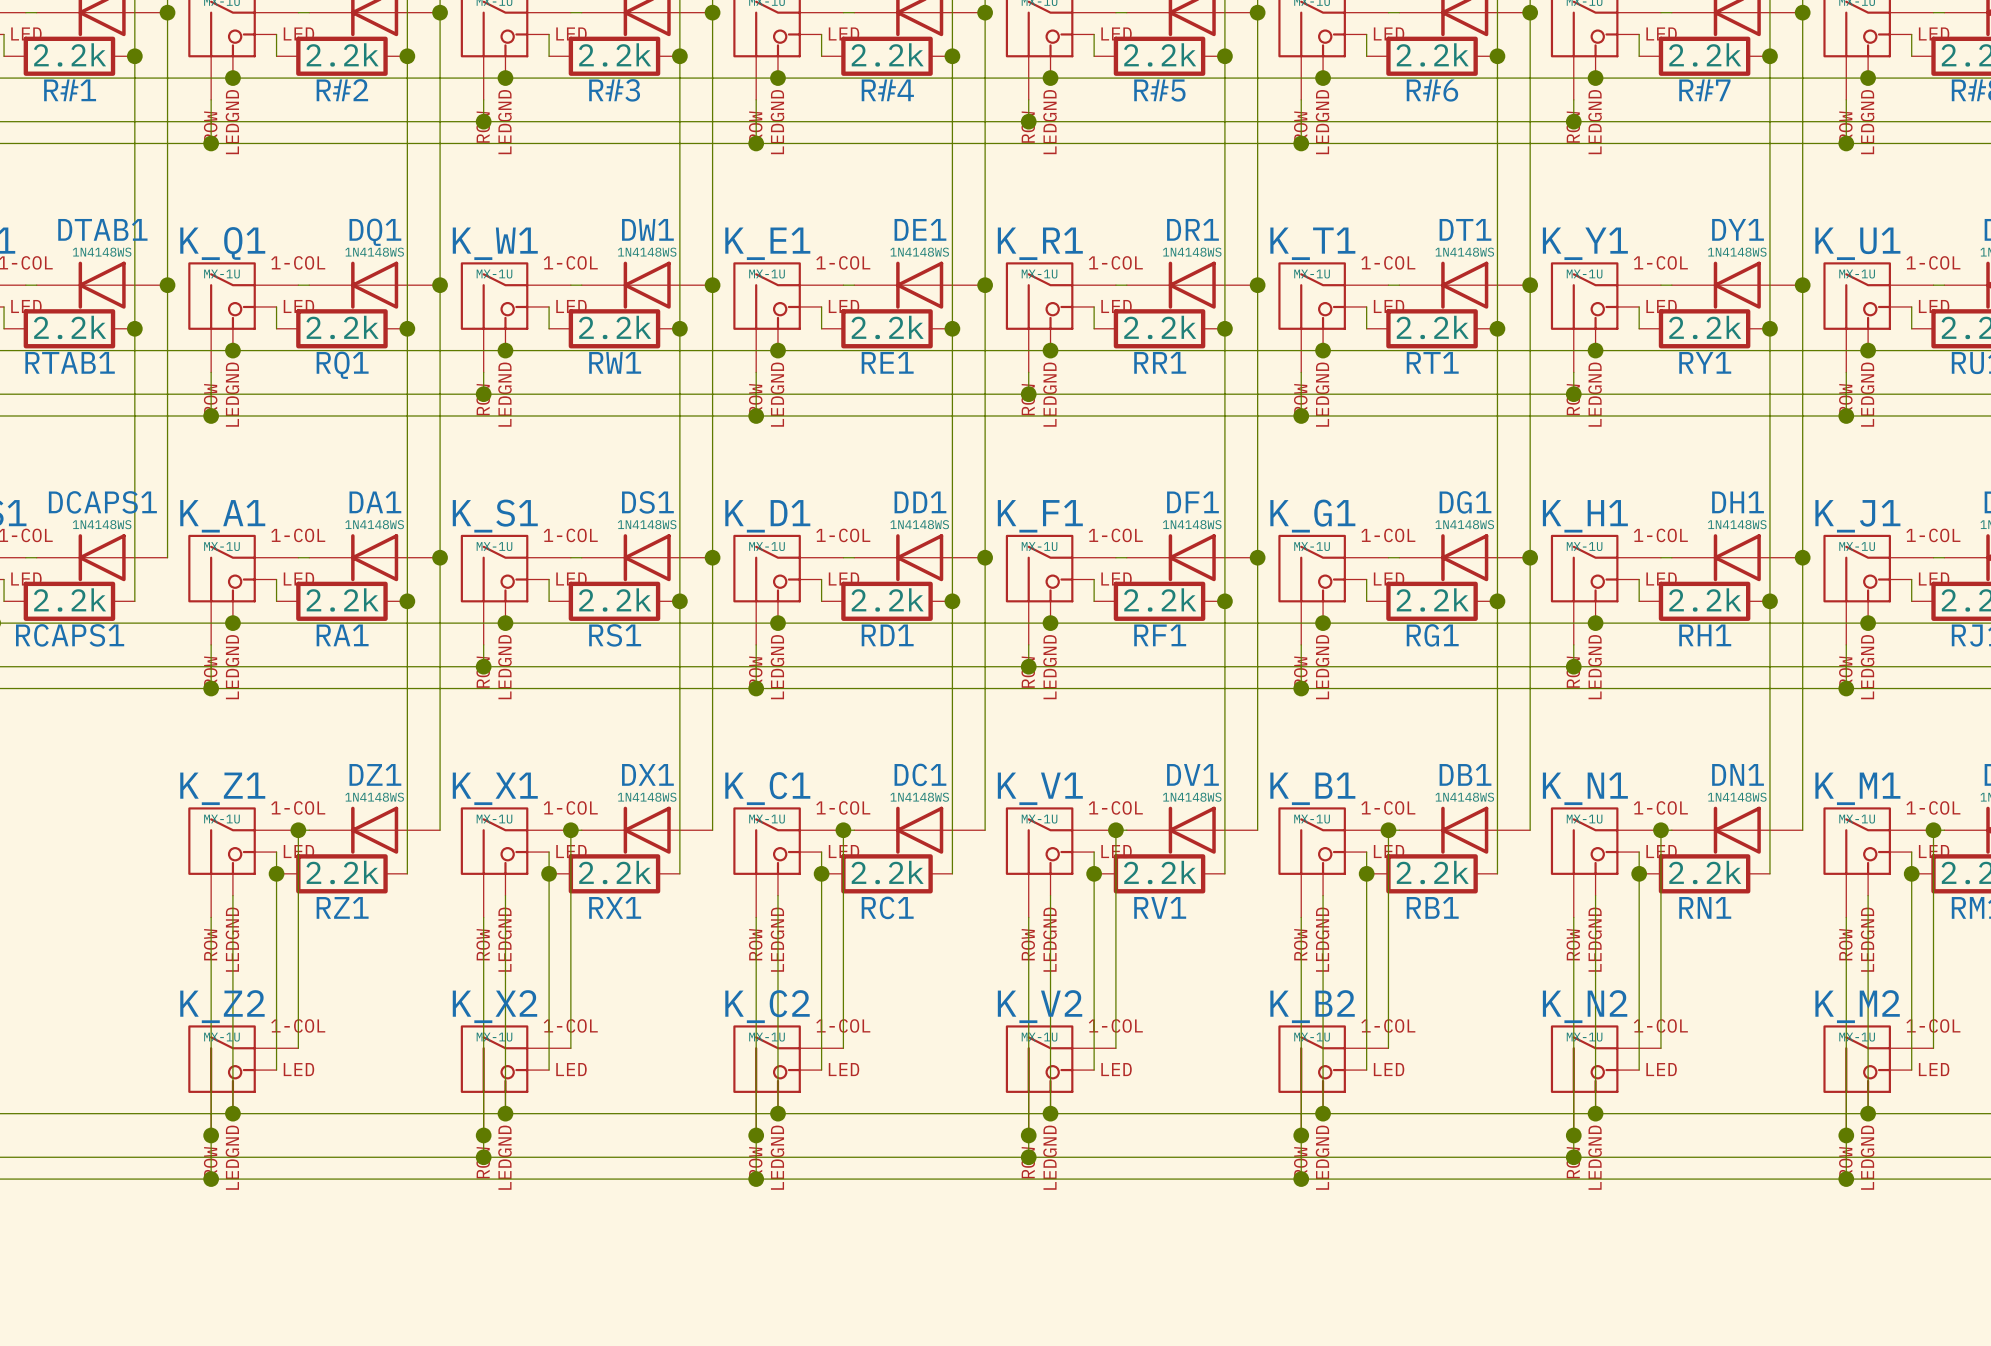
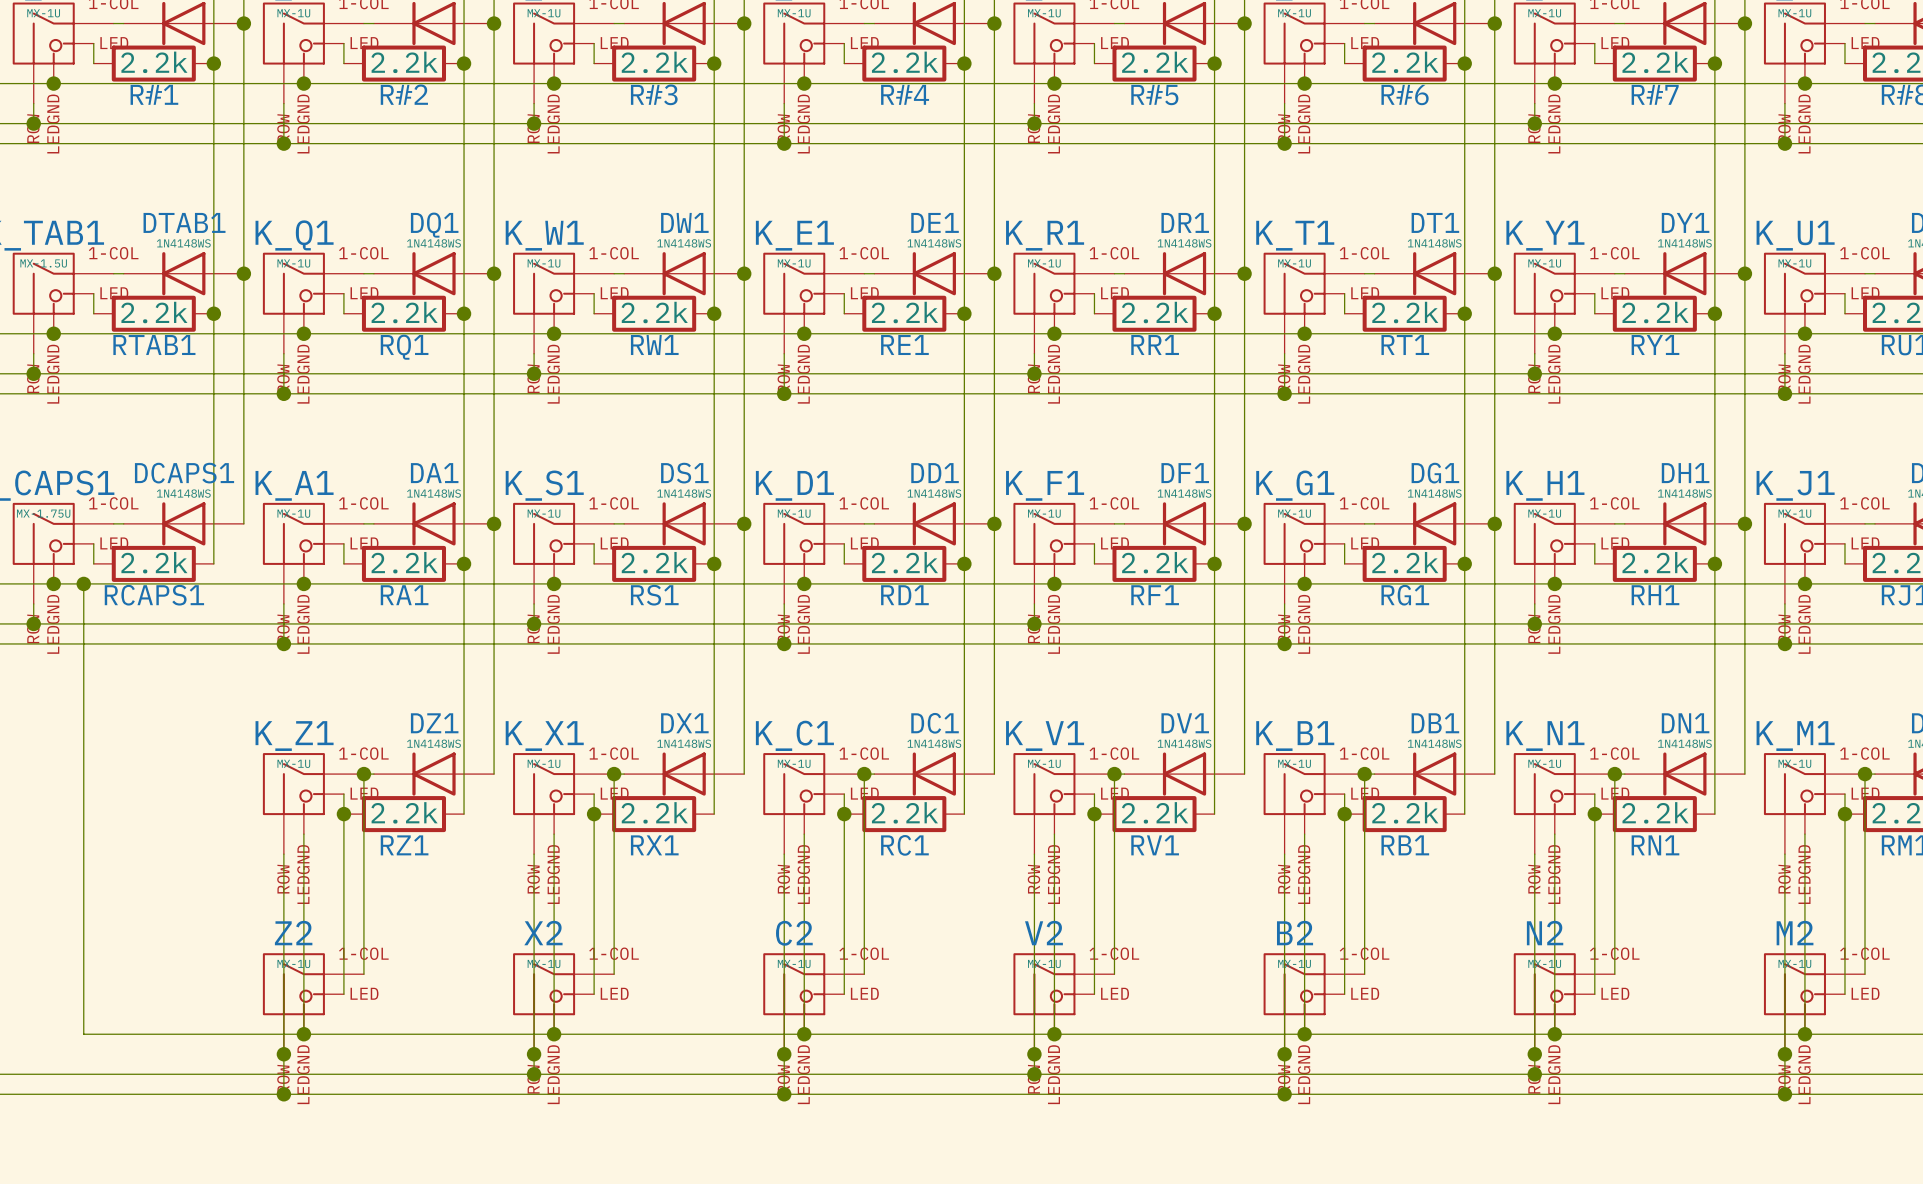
K_Z2 name: K_Z2 (222, 1006) -> Z2 (293, 933)
K_X2 name: K_X2 (494, 1006) -> X2 (543, 933)
K_C2 name: K_C2 (767, 1006) -> C2 (794, 933)
K_V2 name: K_V2 (1040, 1006) -> V2 (1043, 933)
K_B2 name: K_B2 (1312, 1006) -> B2 (1295, 933)
K_N2 name: K_N2 (1585, 1006) -> N2 (1545, 933)
K_M2 name: K_M2 (1857, 1006) -> M2 (1795, 933)

